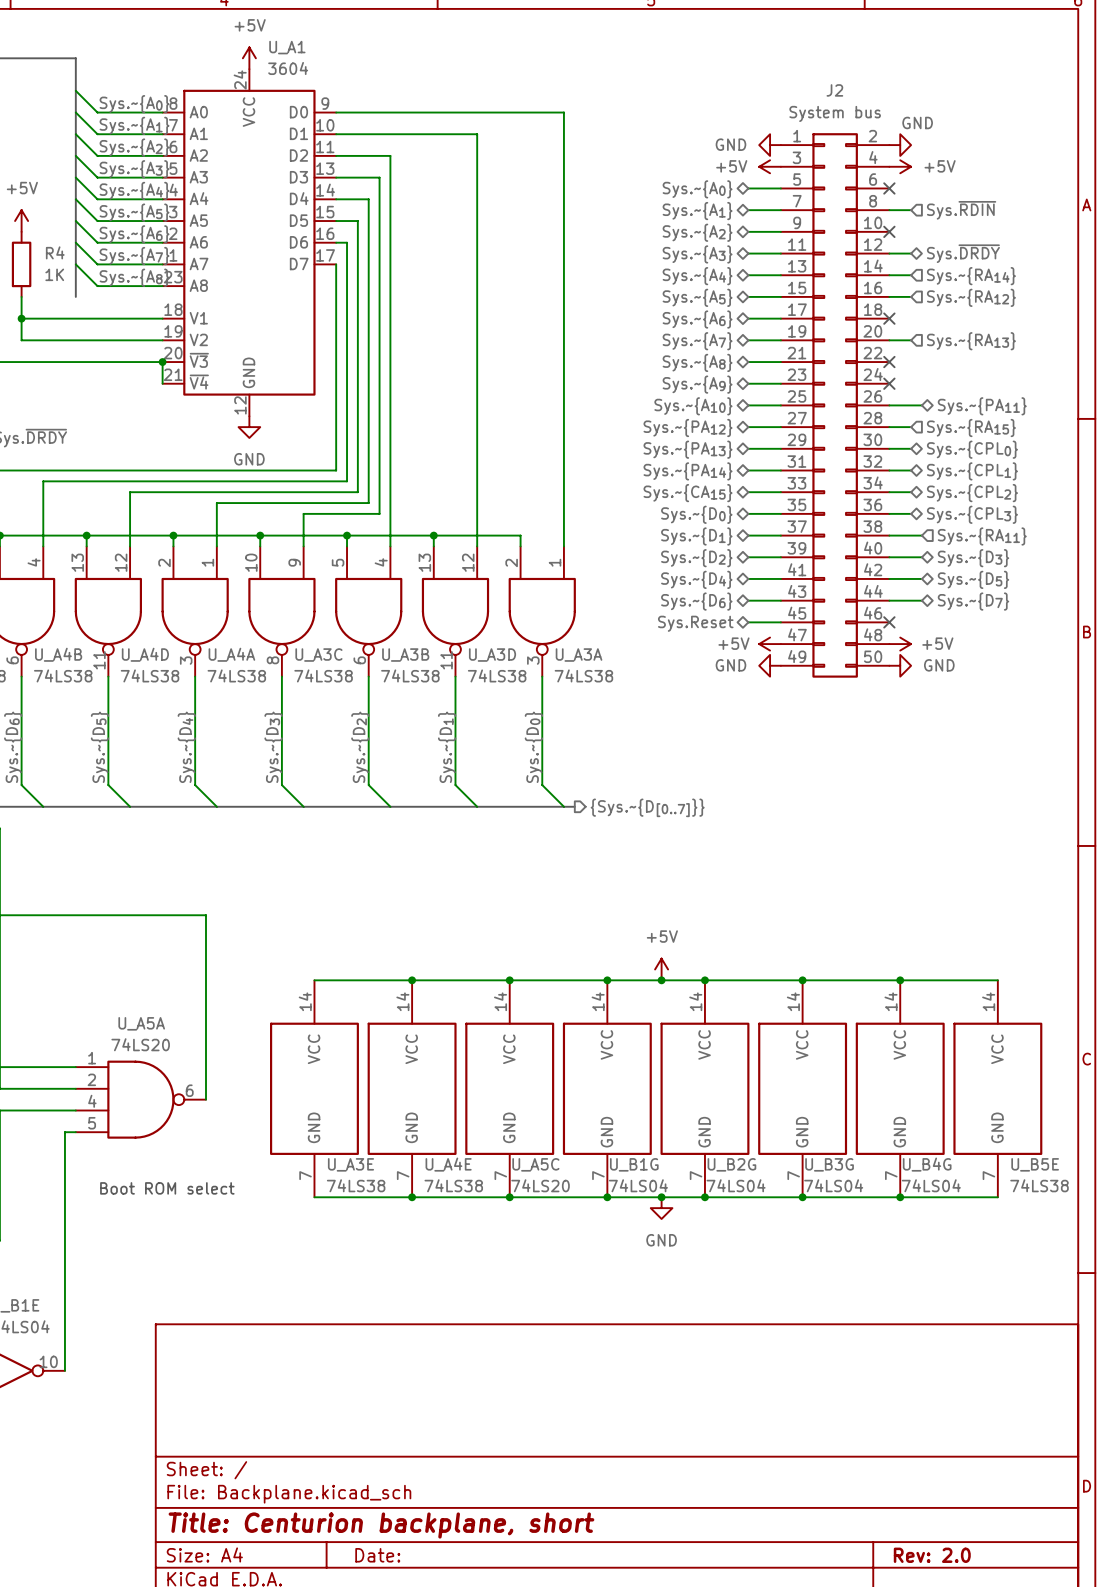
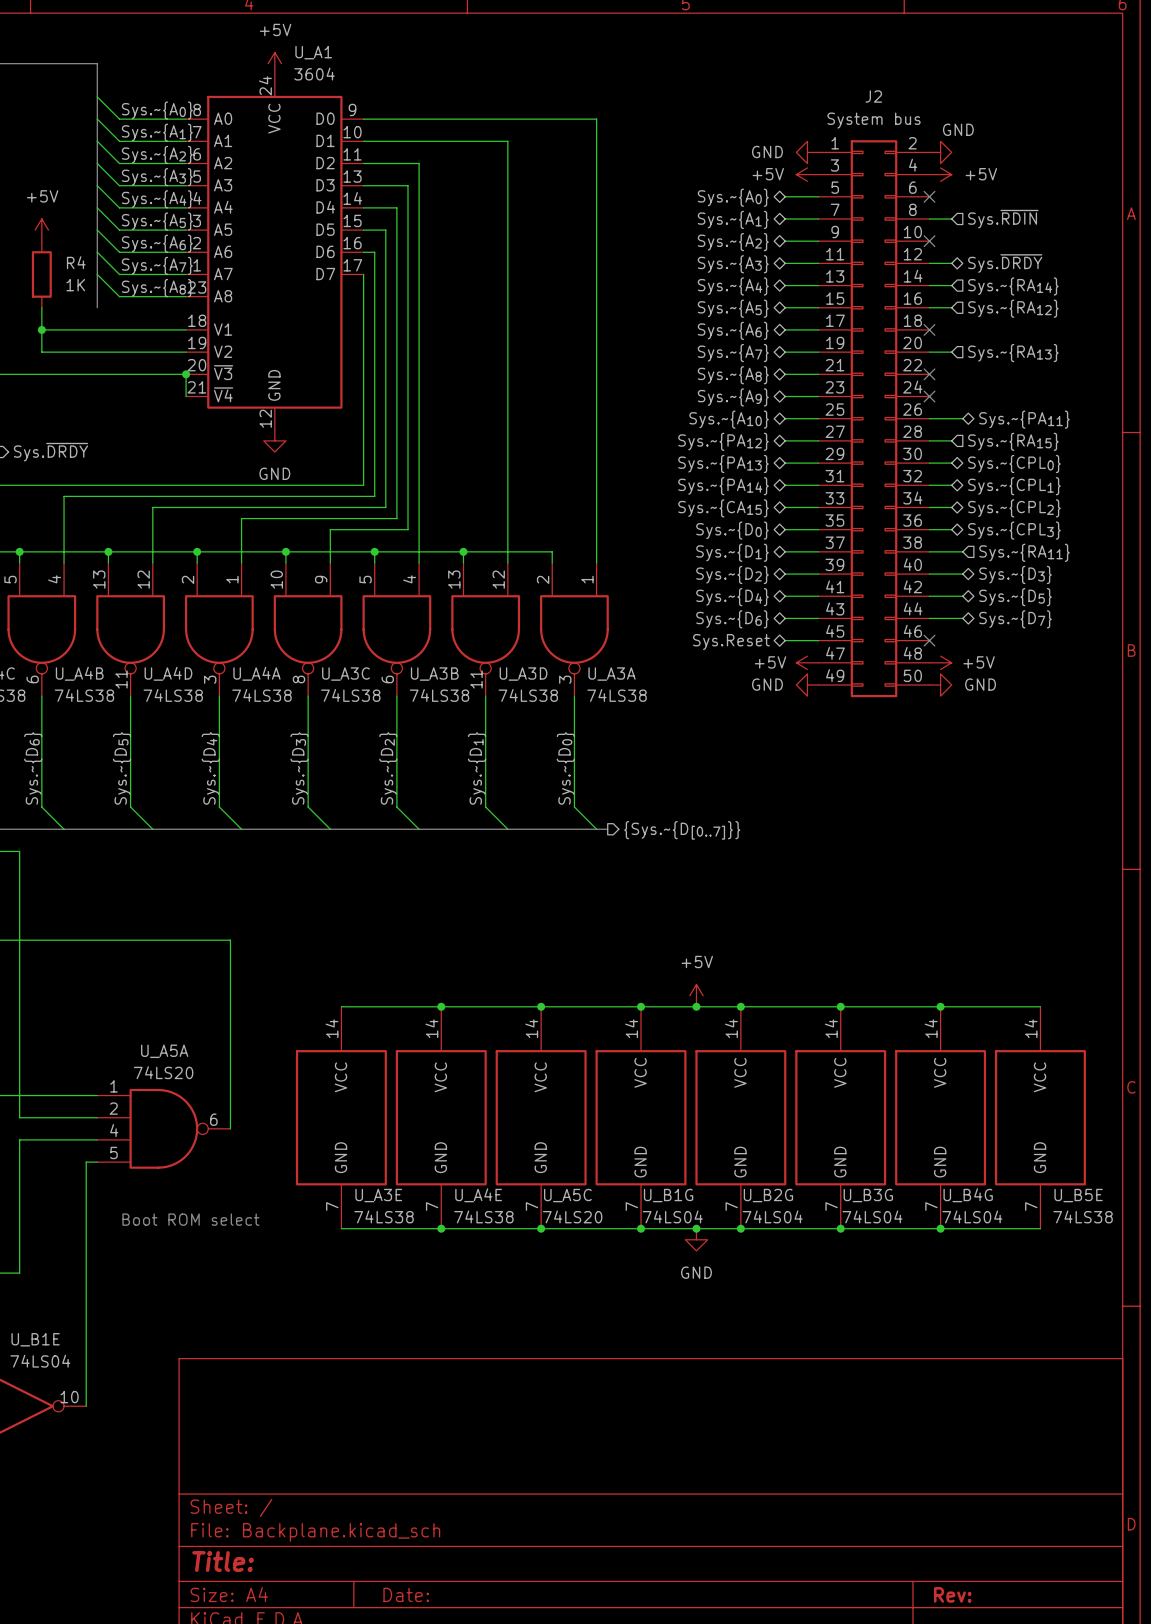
title block: Title: Centurion backplane, short (381, 1525) -> Title: (223, 1561)
title block: Rev: 2.0 (932, 1555) -> Rev: (952, 1594)

